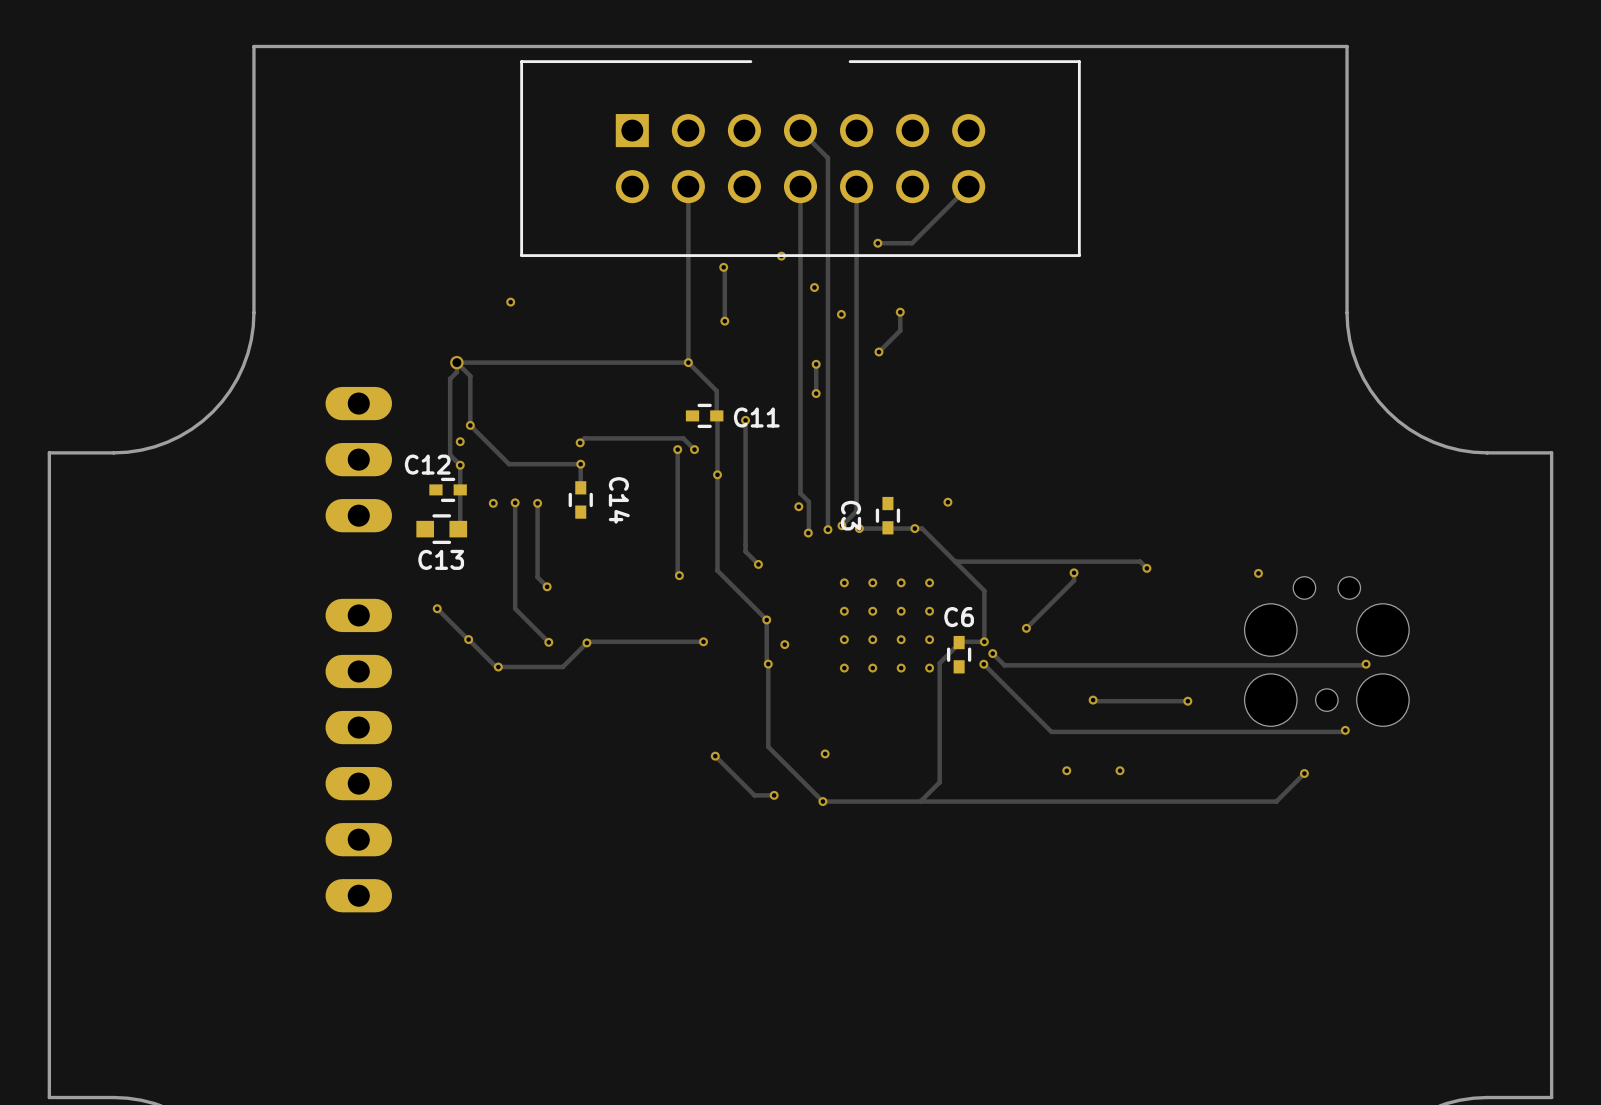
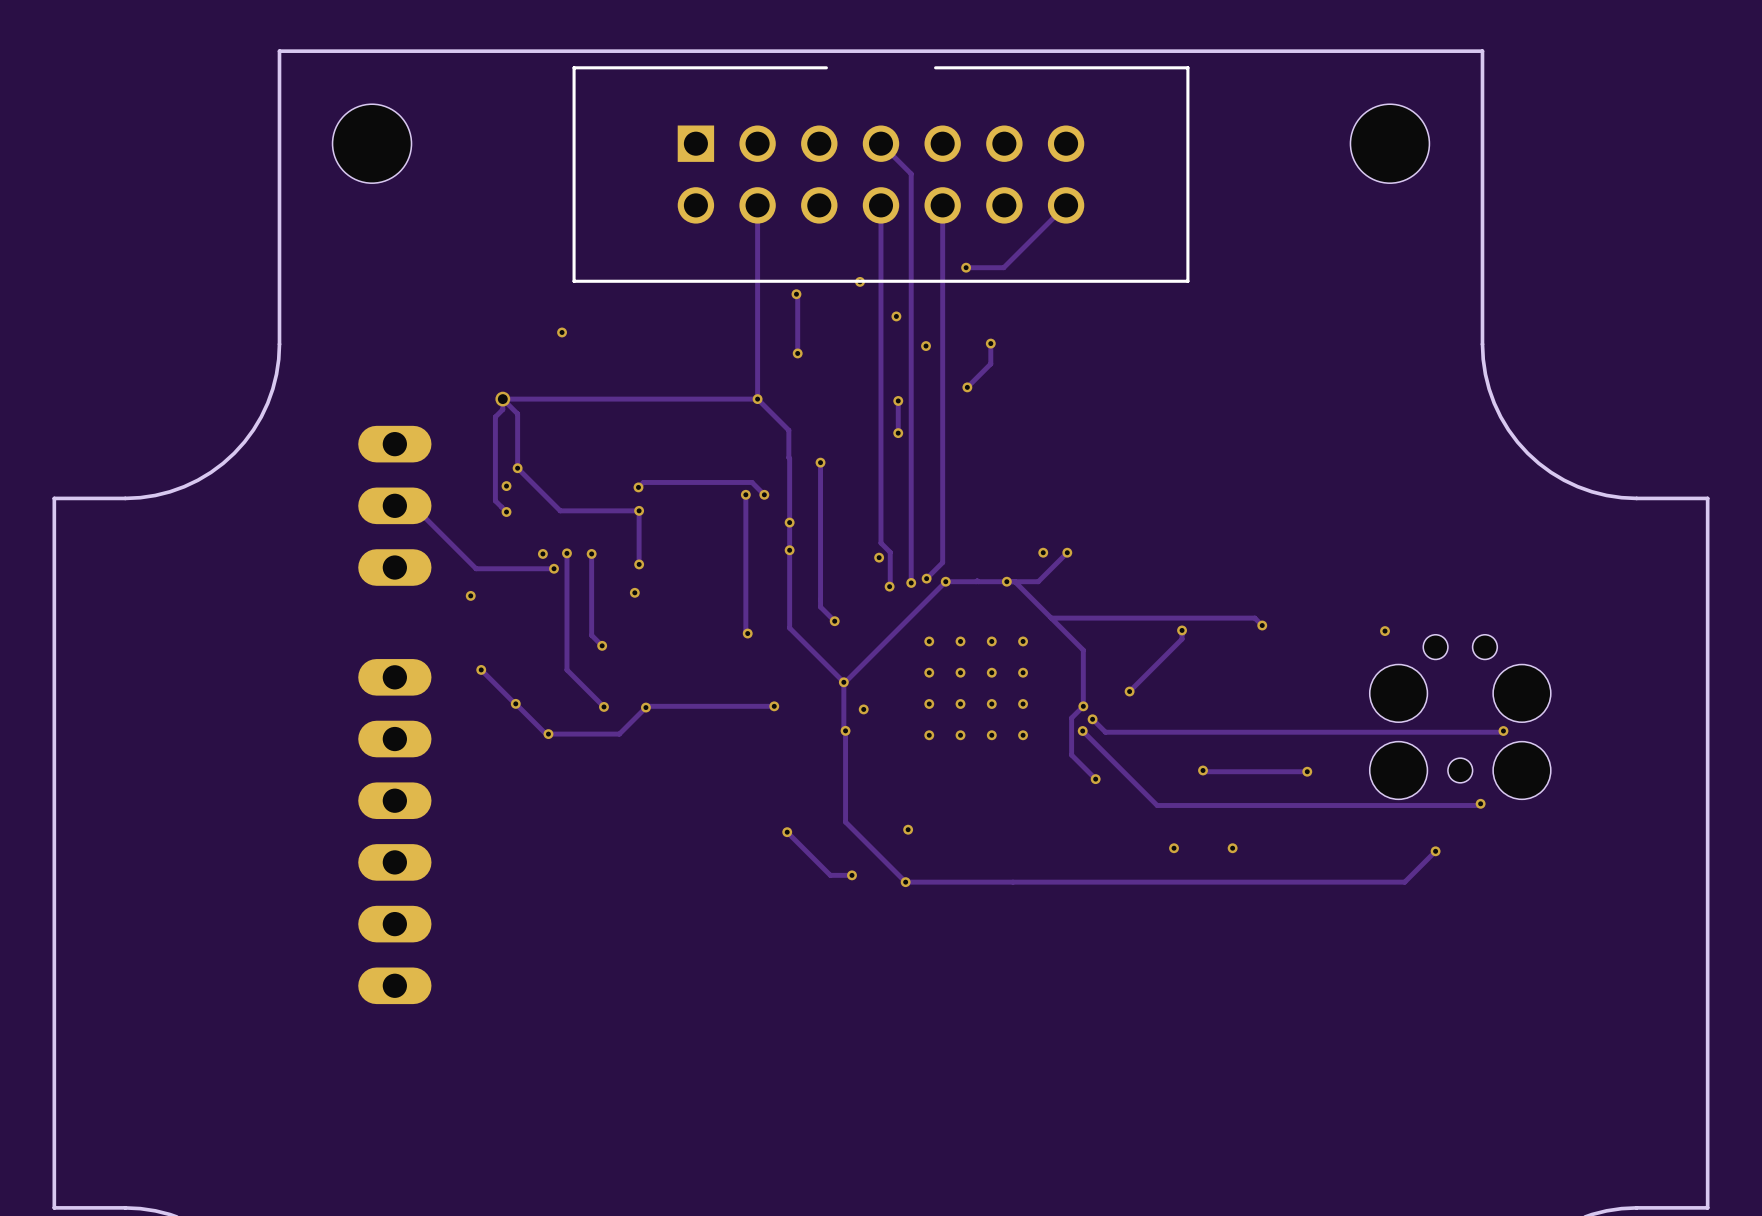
part: none -> (372, 143)
part: none -> (1389, 143)
C11: (704, 415) -> none
track: none -> (394, 505) (413, 505) (476, 568) (554, 568)
track: (460, 465) (460, 527) (458, 529) -> none
track: none -> (639, 536) (639, 564)
C12: (448, 489) -> none
C14: (580, 499) -> none
via: none -> (789, 550)
track: none -> (1067, 552) (1038, 581) (1014, 581)
via: none -> (1067, 552)
via: none -> (639, 564)
C3: (887, 515) -> none
via: none -> (554, 568)
track: none -> (945, 581) (843, 682)
C13: (441, 529) -> none
via: none -> (634, 592)
via: none -> (470, 595)
track: (984, 641) (959, 641) (939, 663) (939, 782) (920, 801) -> (1083, 706) (1071, 718) (1071, 755) (1095, 779)
C6: (959, 654) -> none
via: none -> (1095, 779)

